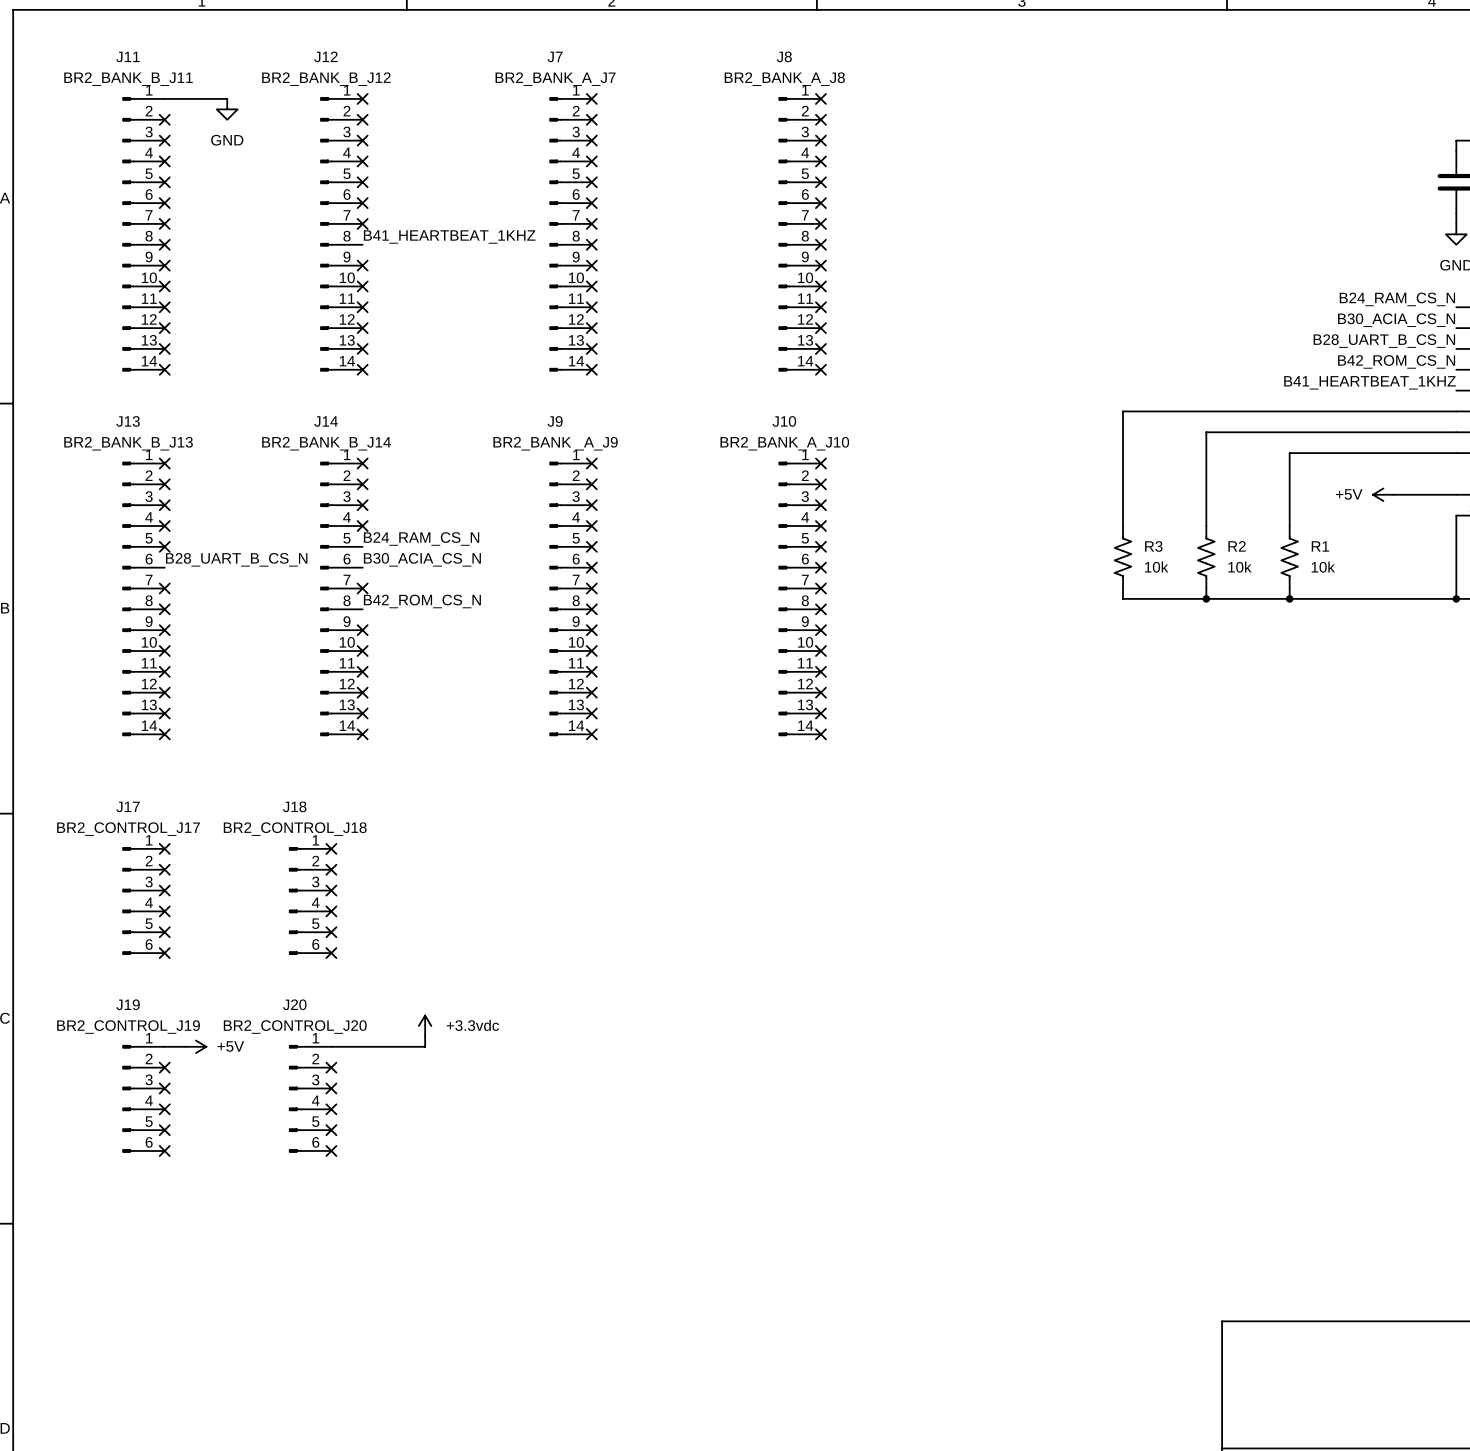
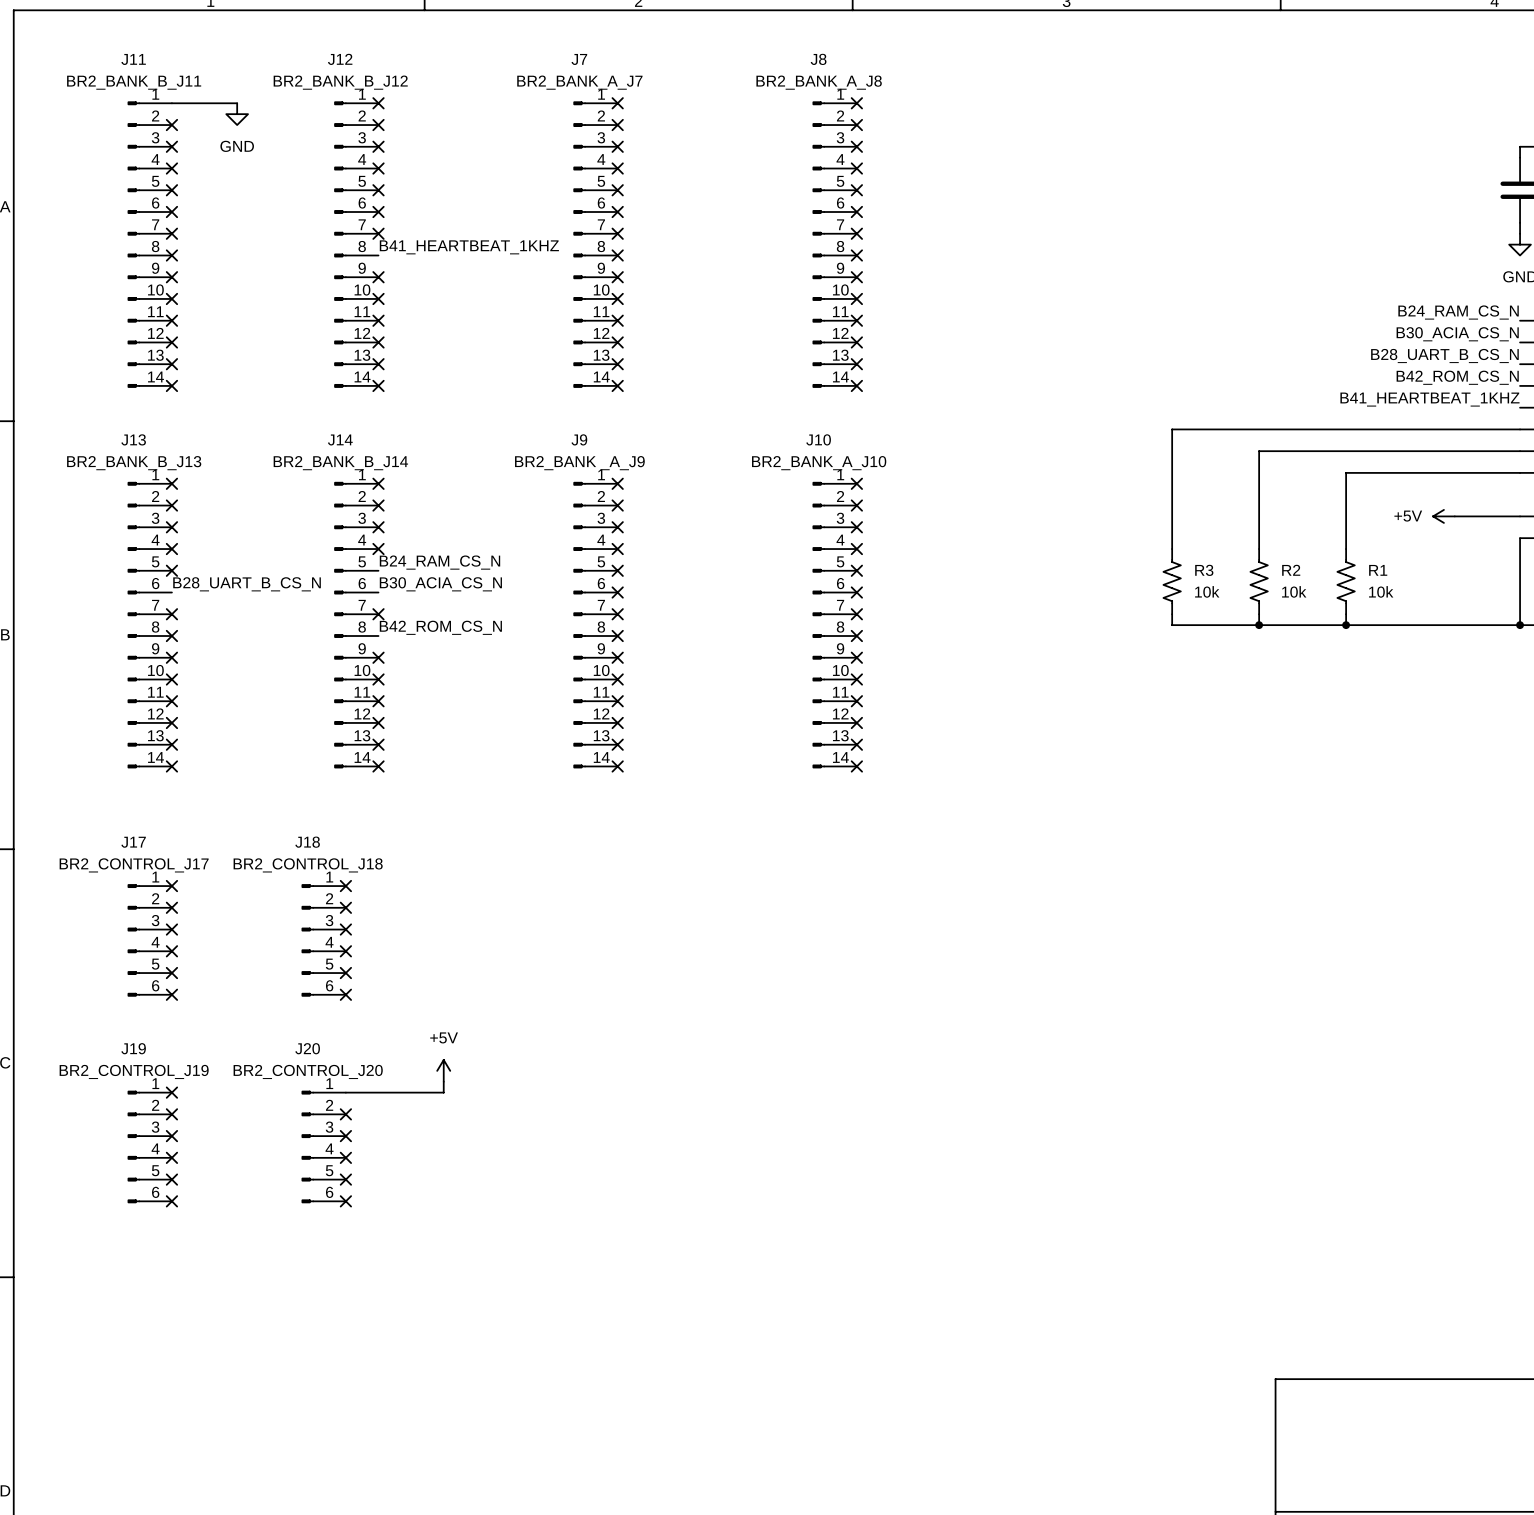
power symbol: +3.3vdc (425, 1025) -> +5V (443, 1070)
wire: (164, 1046) (185, 1046) -> none
no-connect mark: none -> (171, 1092)
power symbol: +5V (195, 1046) -> none

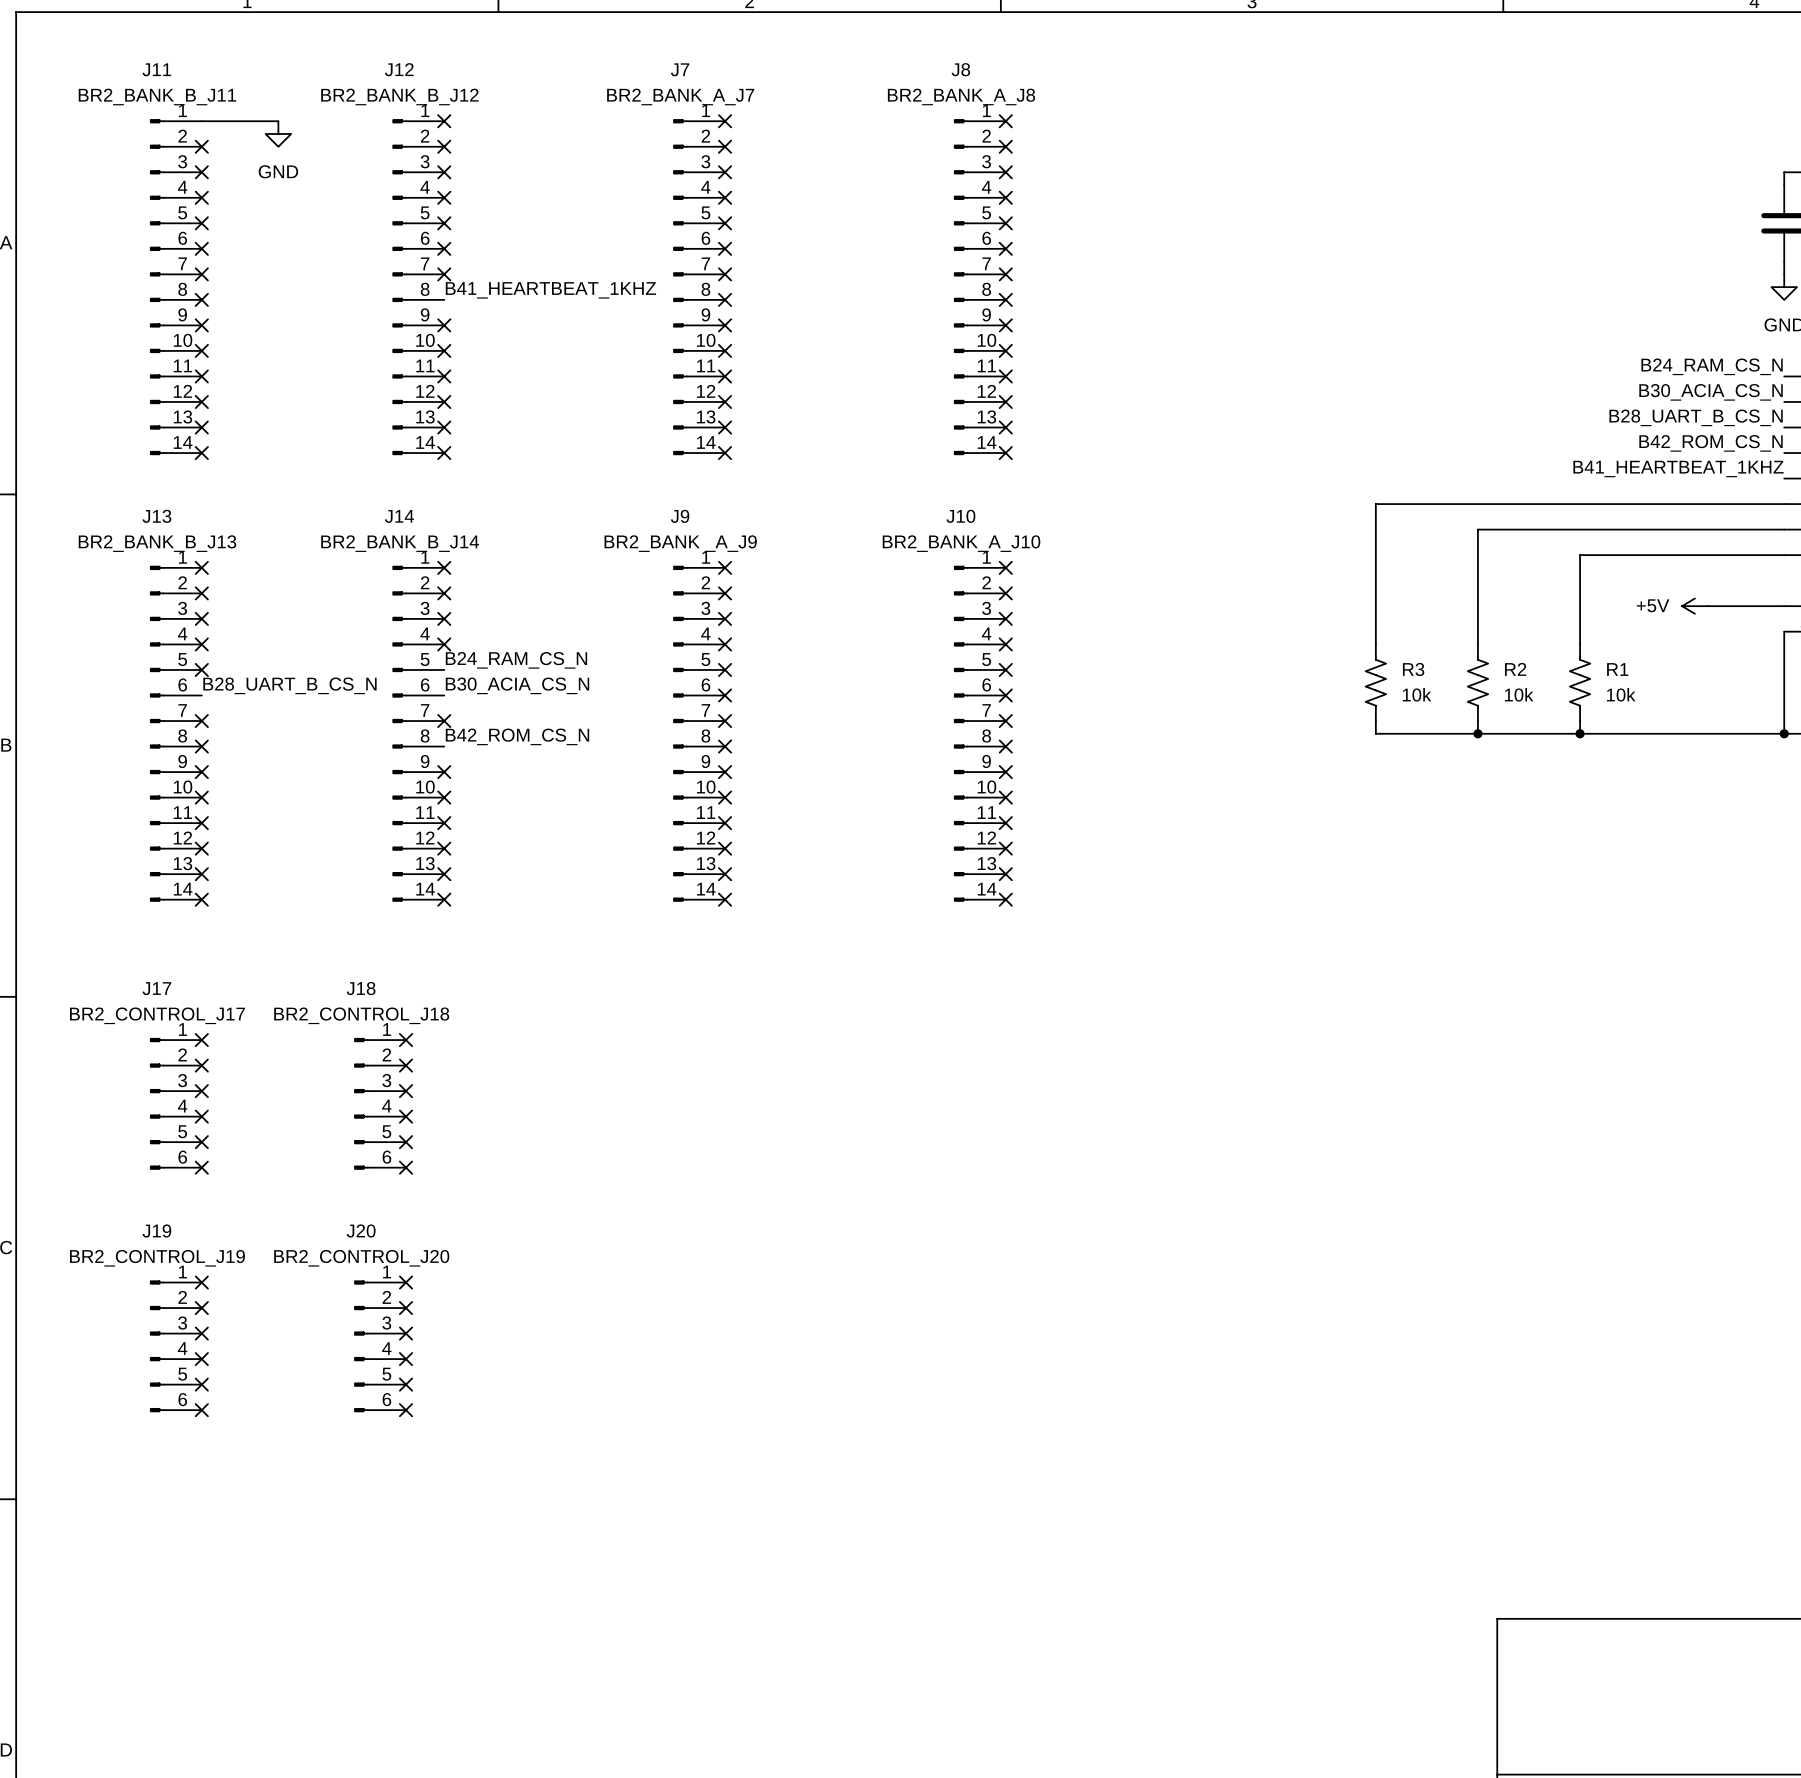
power symbol: +5V (443, 1070) -> none
wire: (443, 1081) (443, 1092) (345, 1092) -> none
no-connect mark: none -> (406, 1282)

